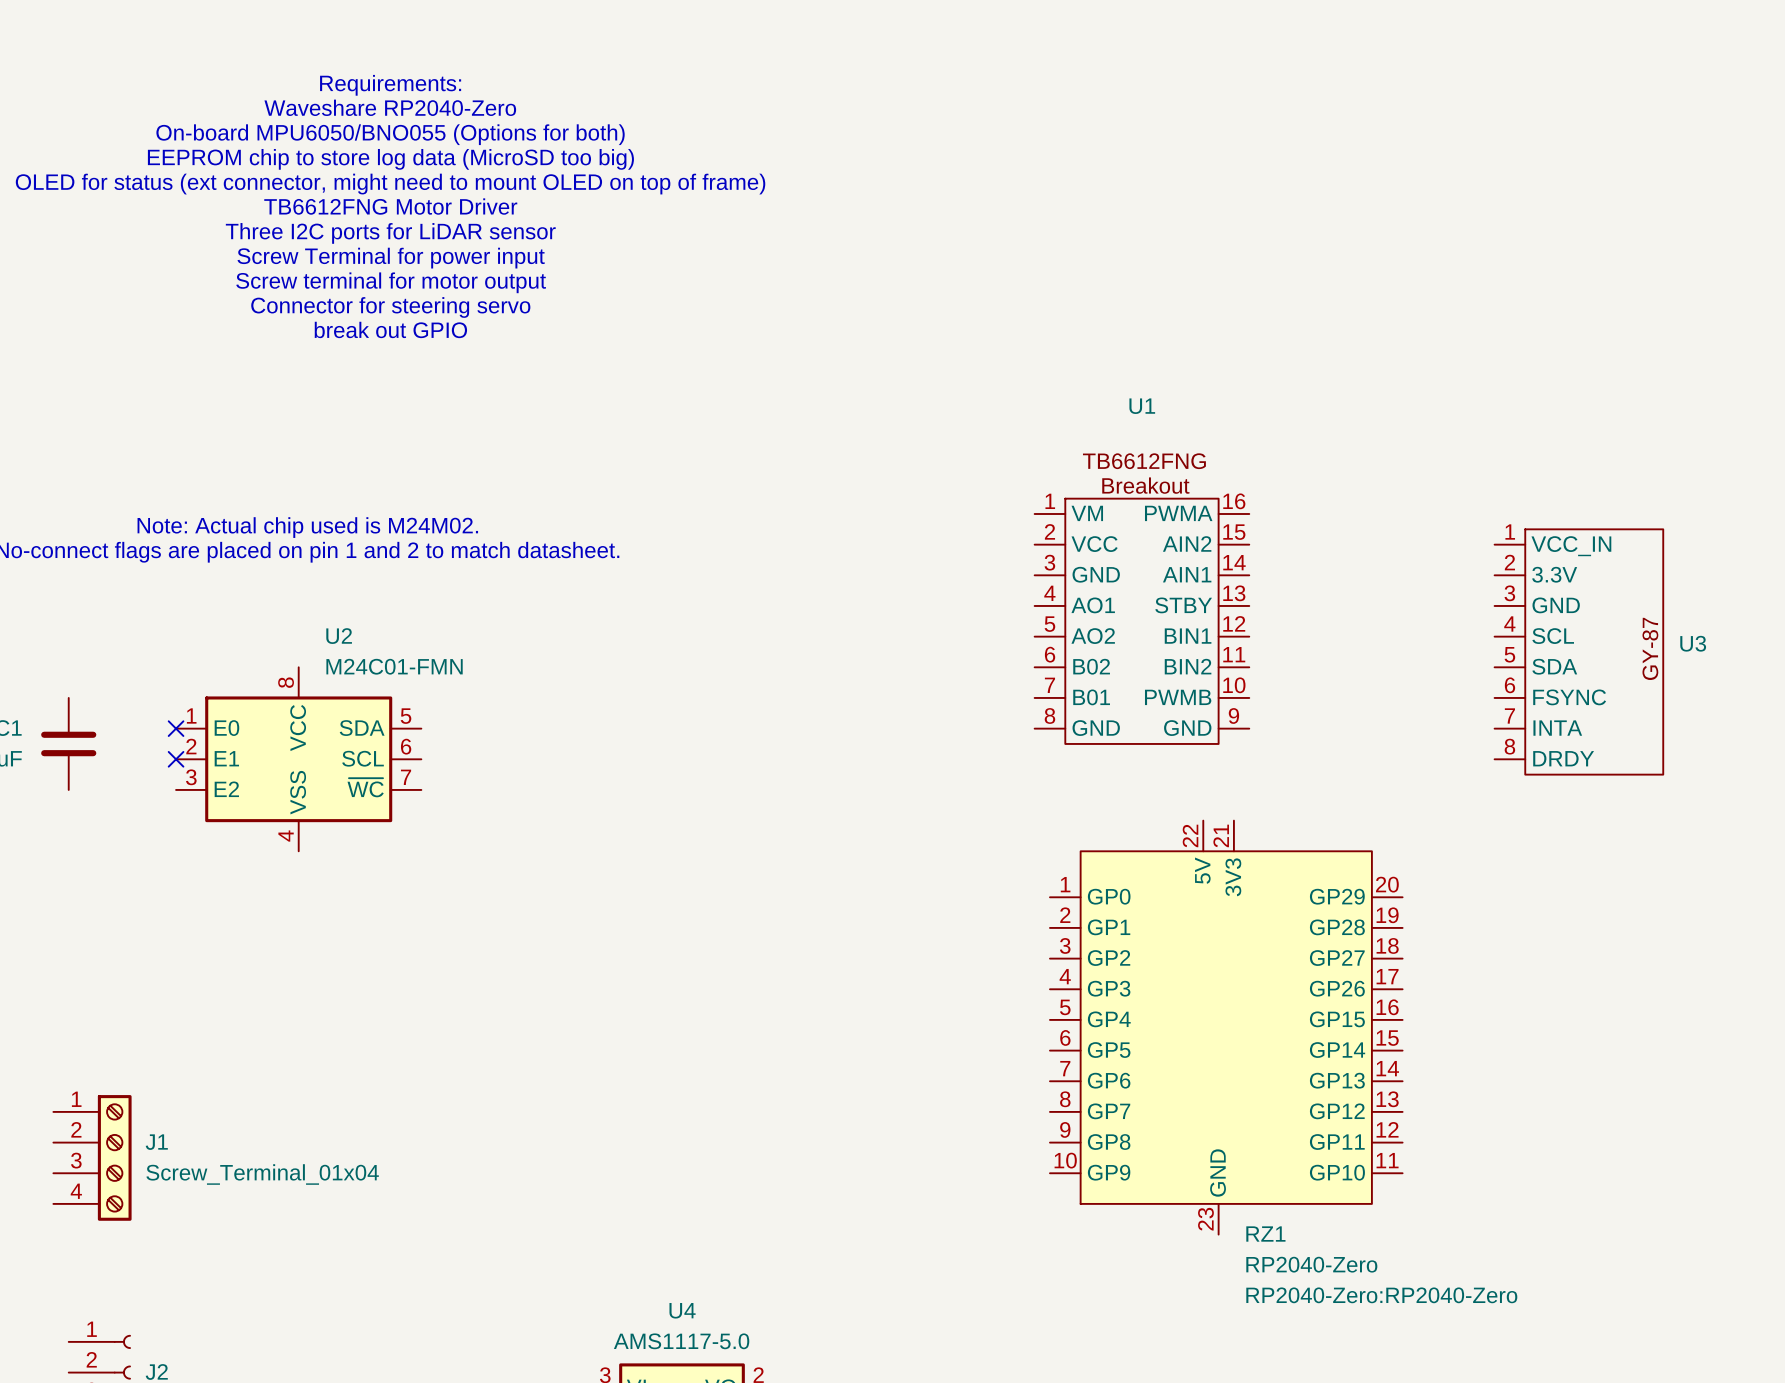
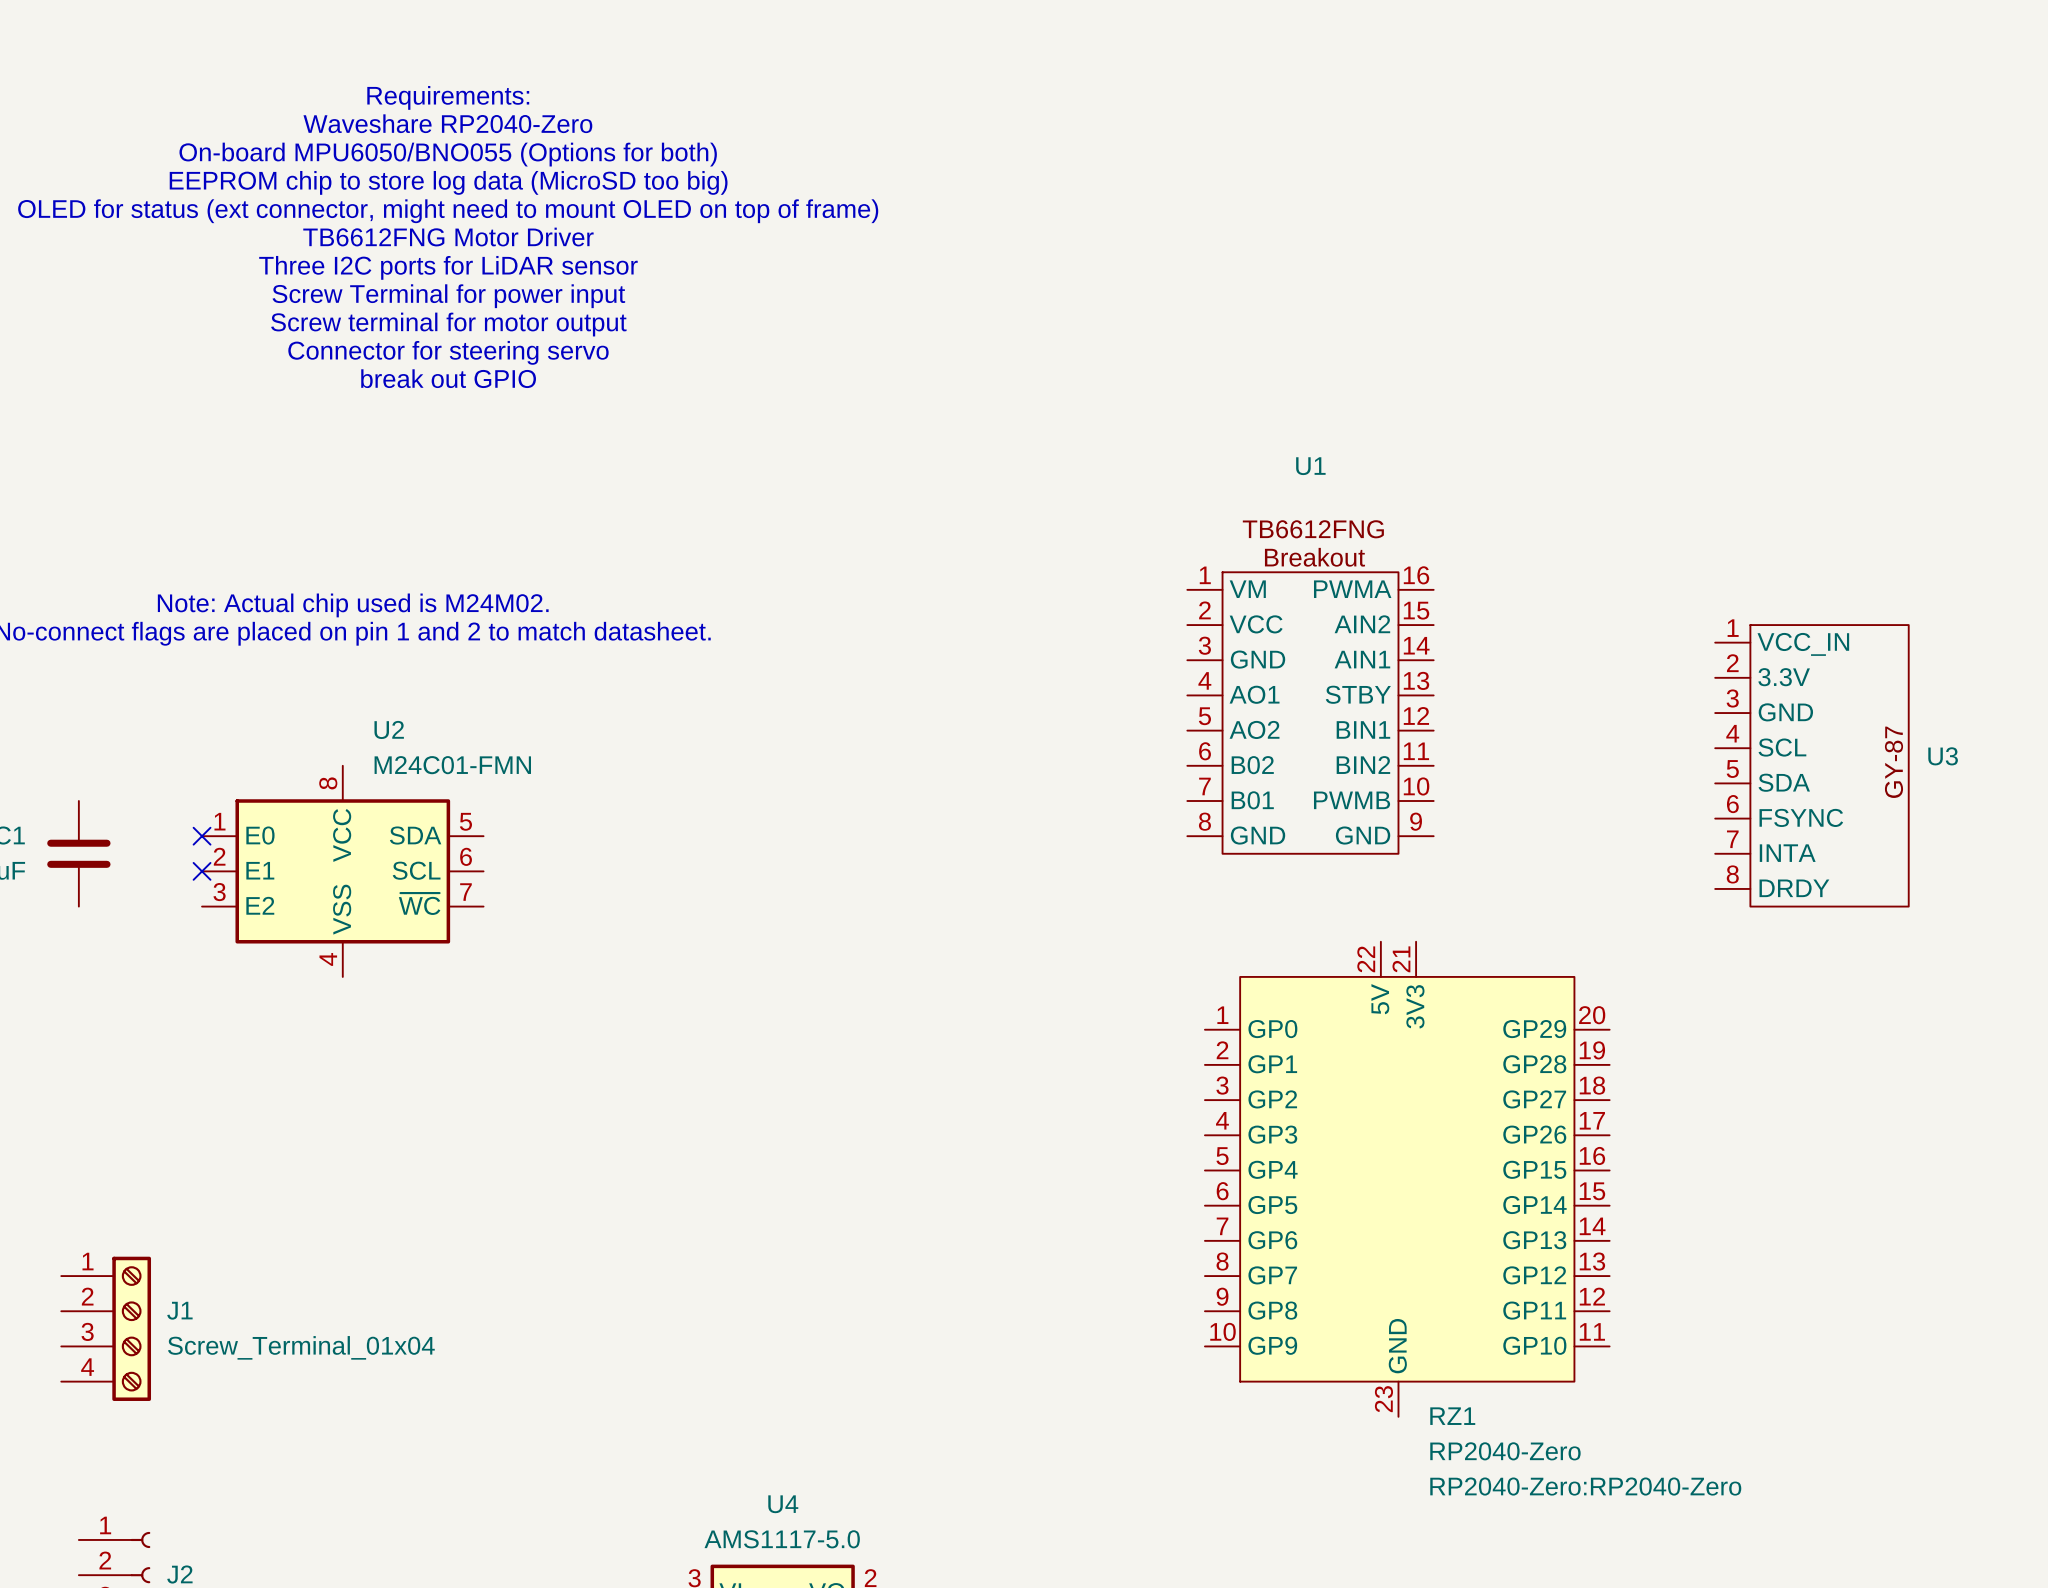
U3 position: (1578, 651) -> (1811, 765)

